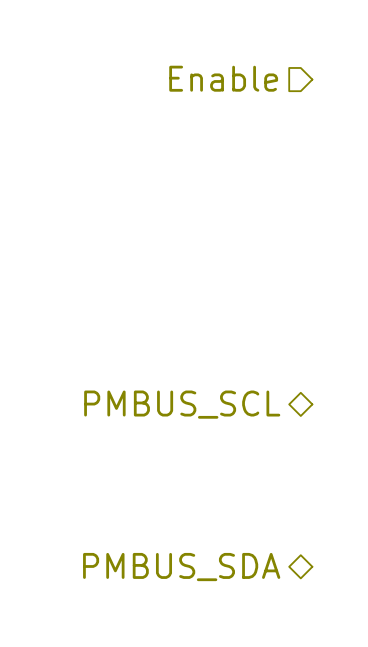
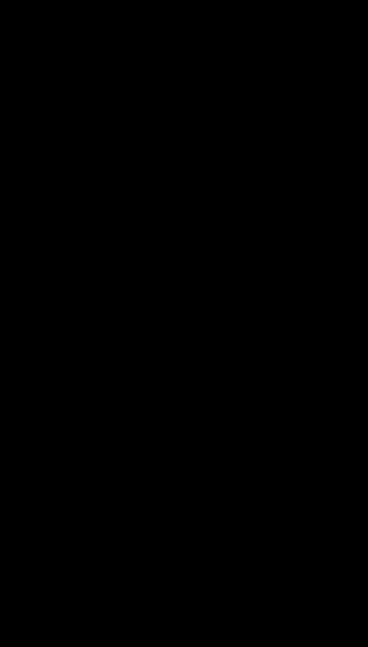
hierarchical label: Enable (223, 78) -> none
hierarchical label: PMBUS_SCL (182, 404) -> none
hierarchical label: PMBUS_SDA (181, 567) -> none

